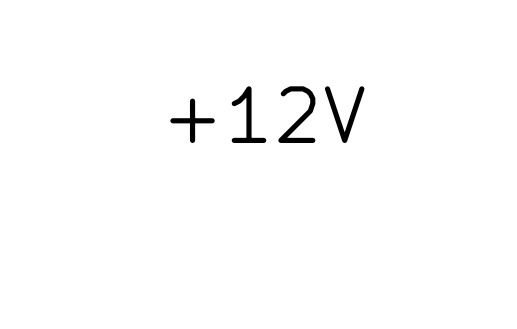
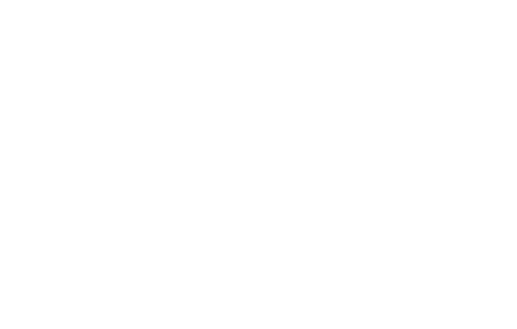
text: +12V (267, 114) -> none

